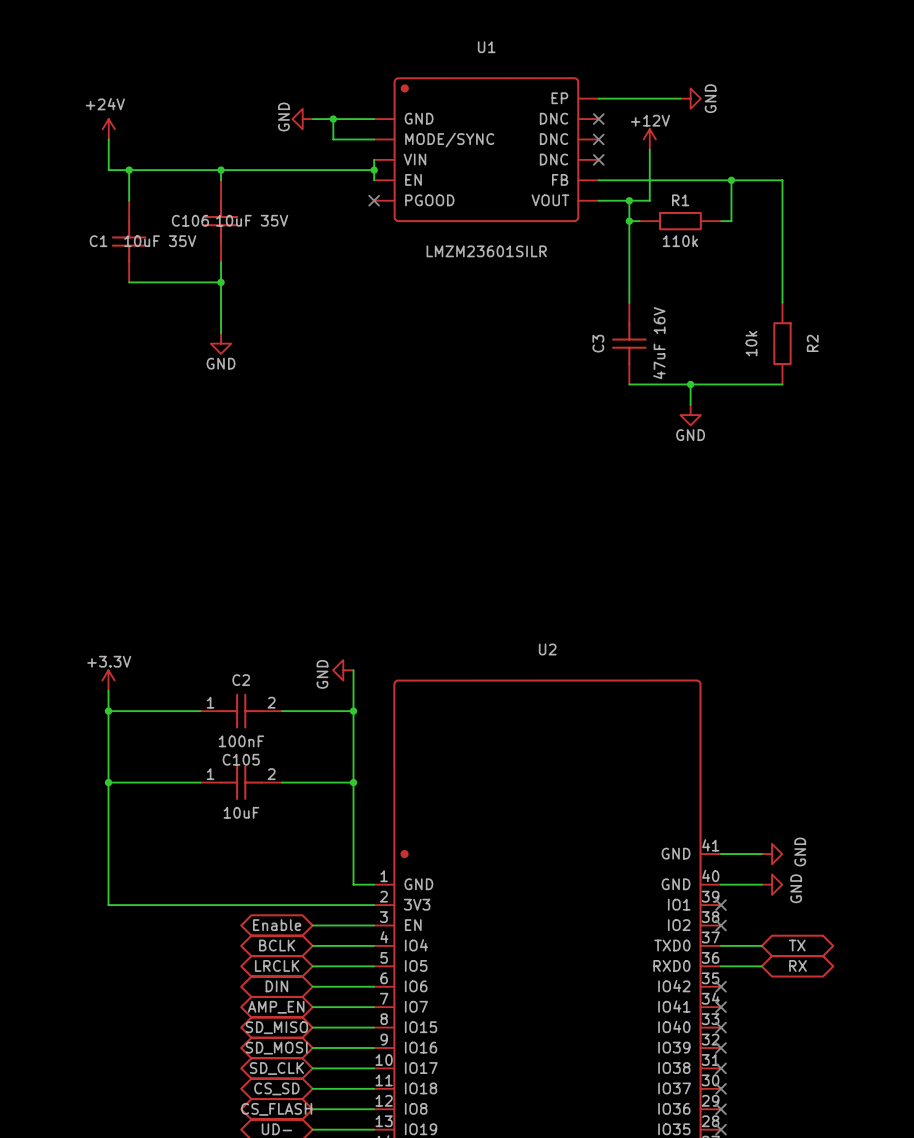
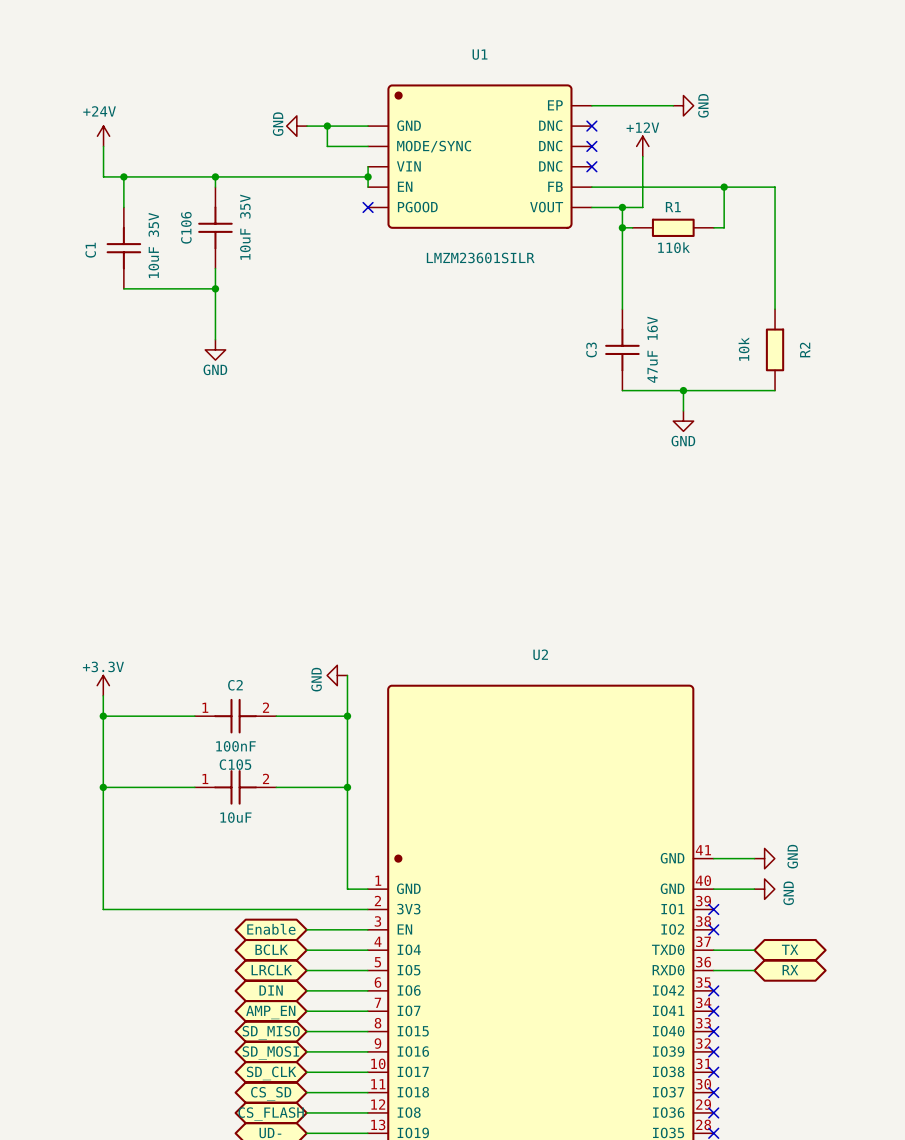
C106 name rotation: 0° (190, 220) -> 90° counterclockwise (186, 227)
C106 value rotation: 0° (252, 220) -> 90° counterclockwise (245, 227)
C1 name rotation: 0° (98, 241) -> 90° counterclockwise (90, 250)
C1 value rotation: 0° (160, 241) -> 90° counterclockwise (153, 245)

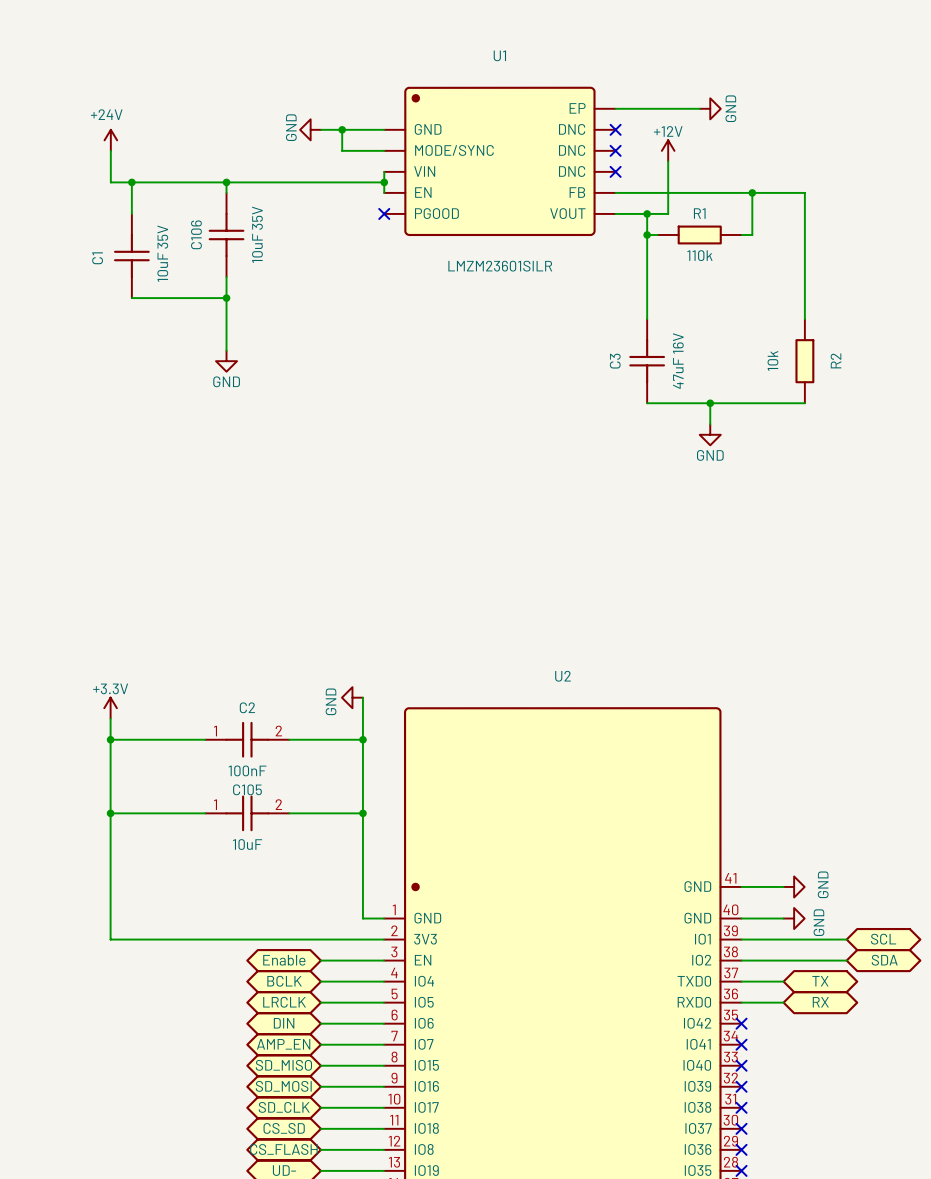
wire: none -> (741, 939) (846, 939)
no-connect mark: (713, 909) -> none
power symbol: none -> SCL (883, 939)
wire: none -> (741, 960) (846, 960)
no-connect mark: (713, 929) -> none
power symbol: none -> SDA (883, 960)

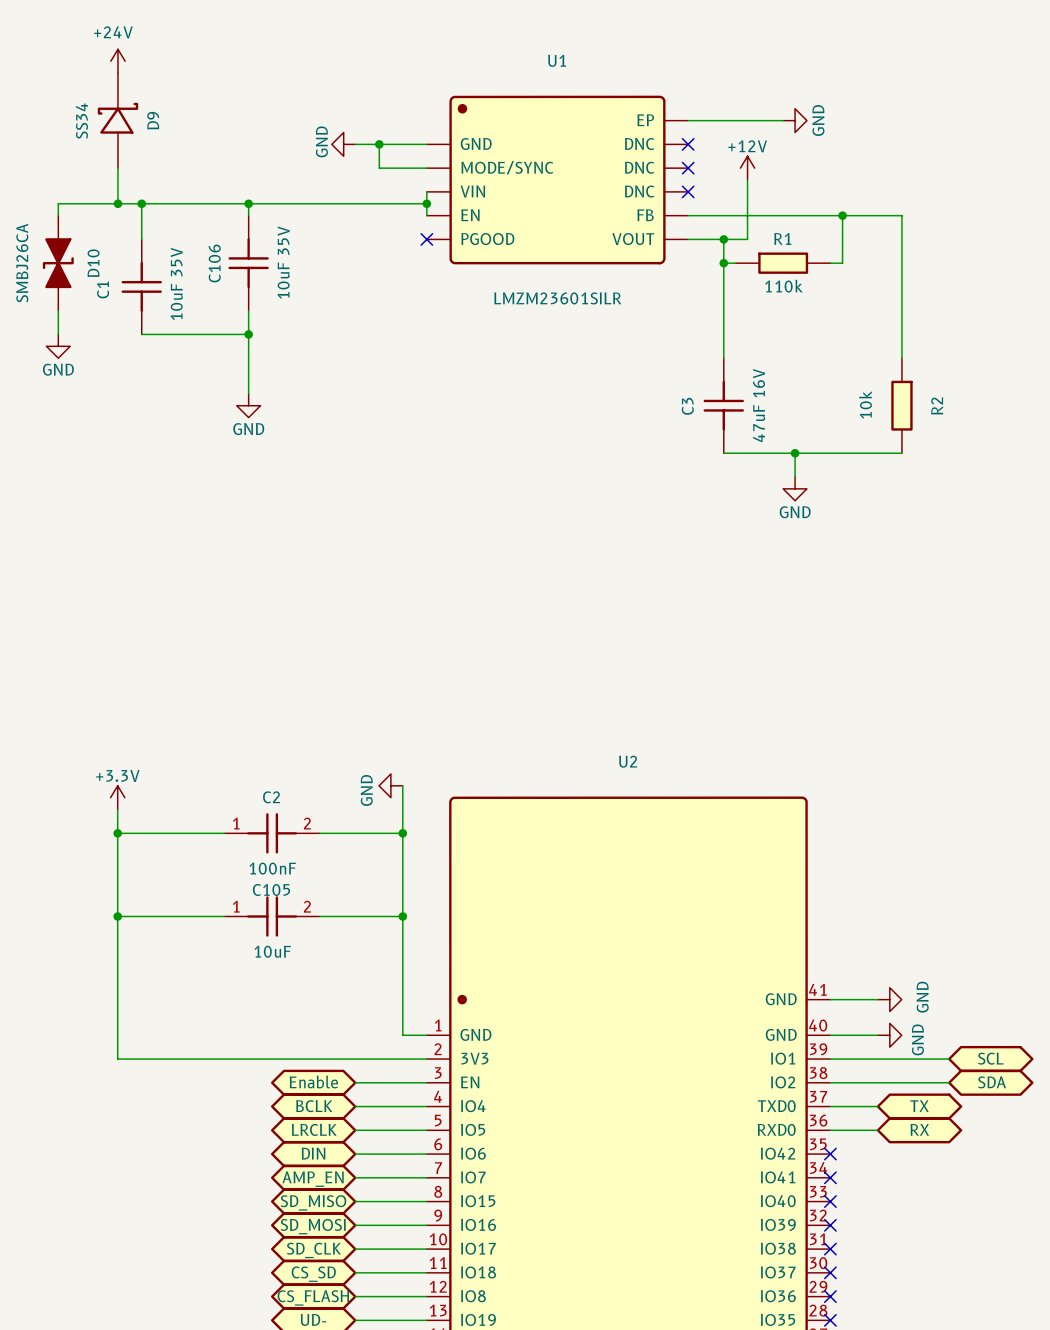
D9: none -> SS34 (117, 120)
power symbol position: +24V (110, 140) -> +24V (117, 61)
wire: none -> (117, 203) (58, 203) (58, 215)
junction: none -> (117, 203)
D10: none -> SMBJ26CA (58, 263)
wire: none -> (58, 310) (58, 334)
power symbol: none -> GND (58, 346)

